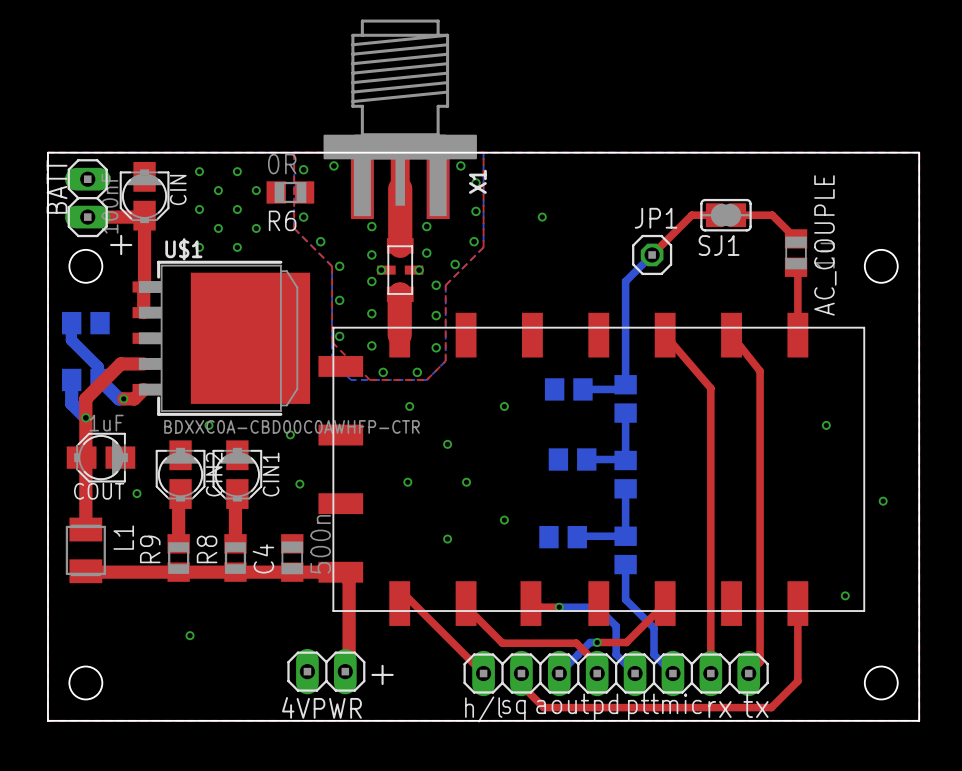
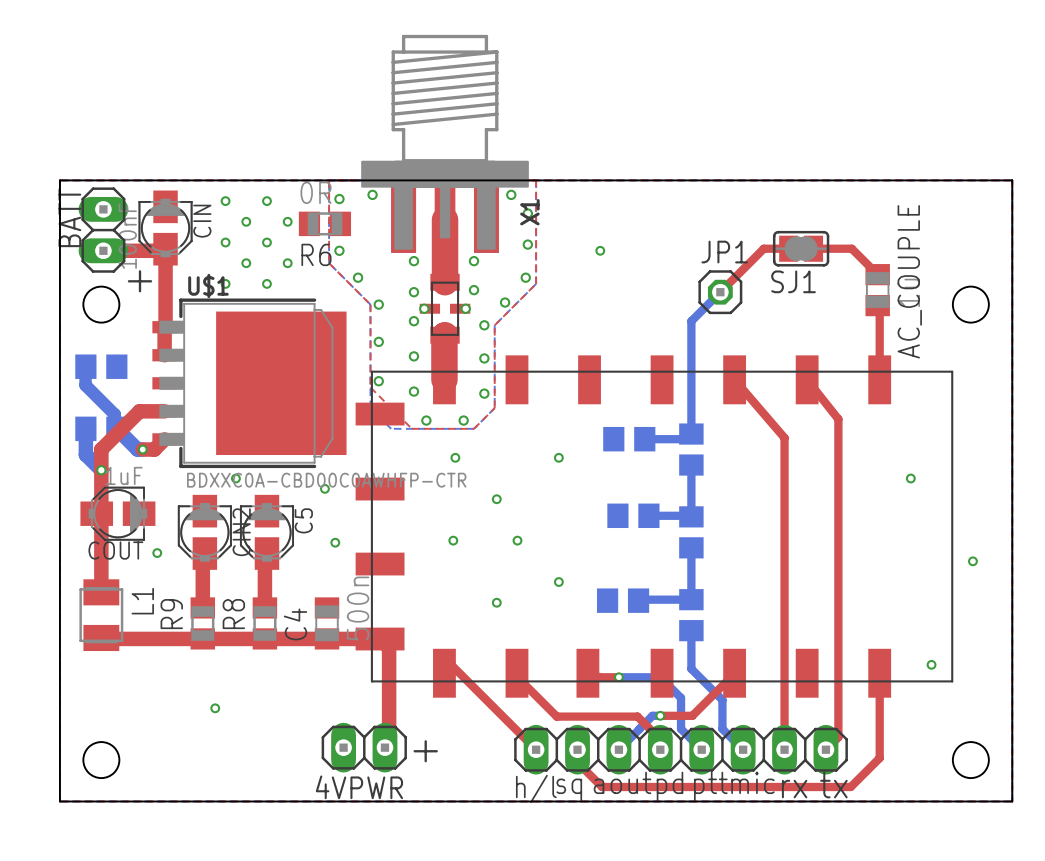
CIN1 name: CIN1 (271, 474) -> C5 (303, 520)

